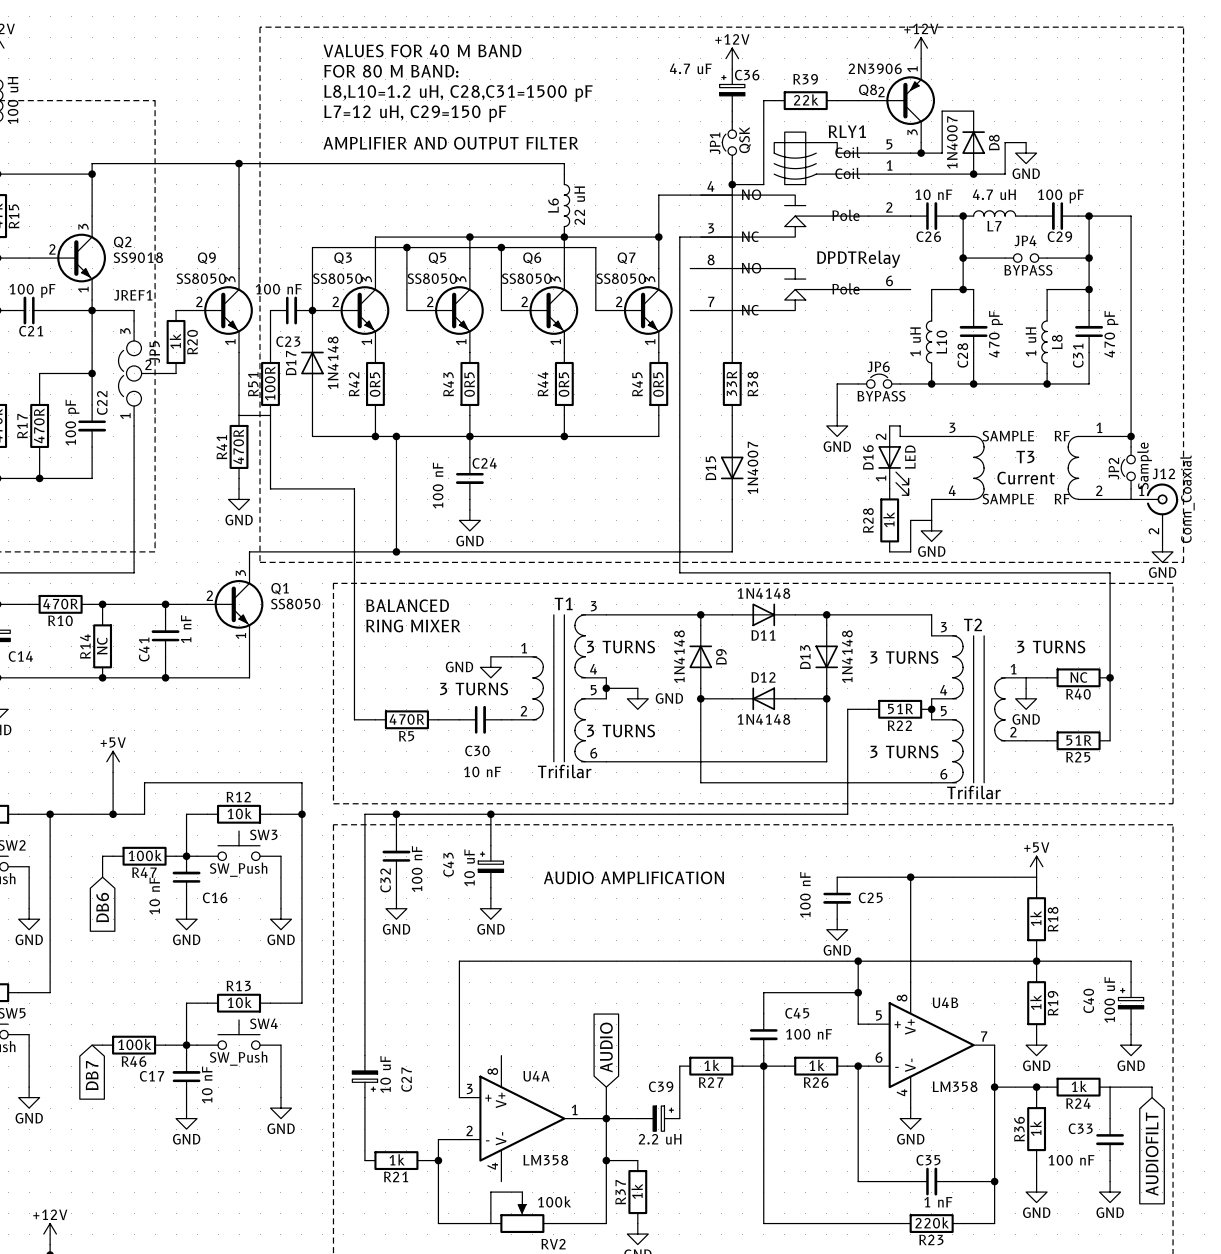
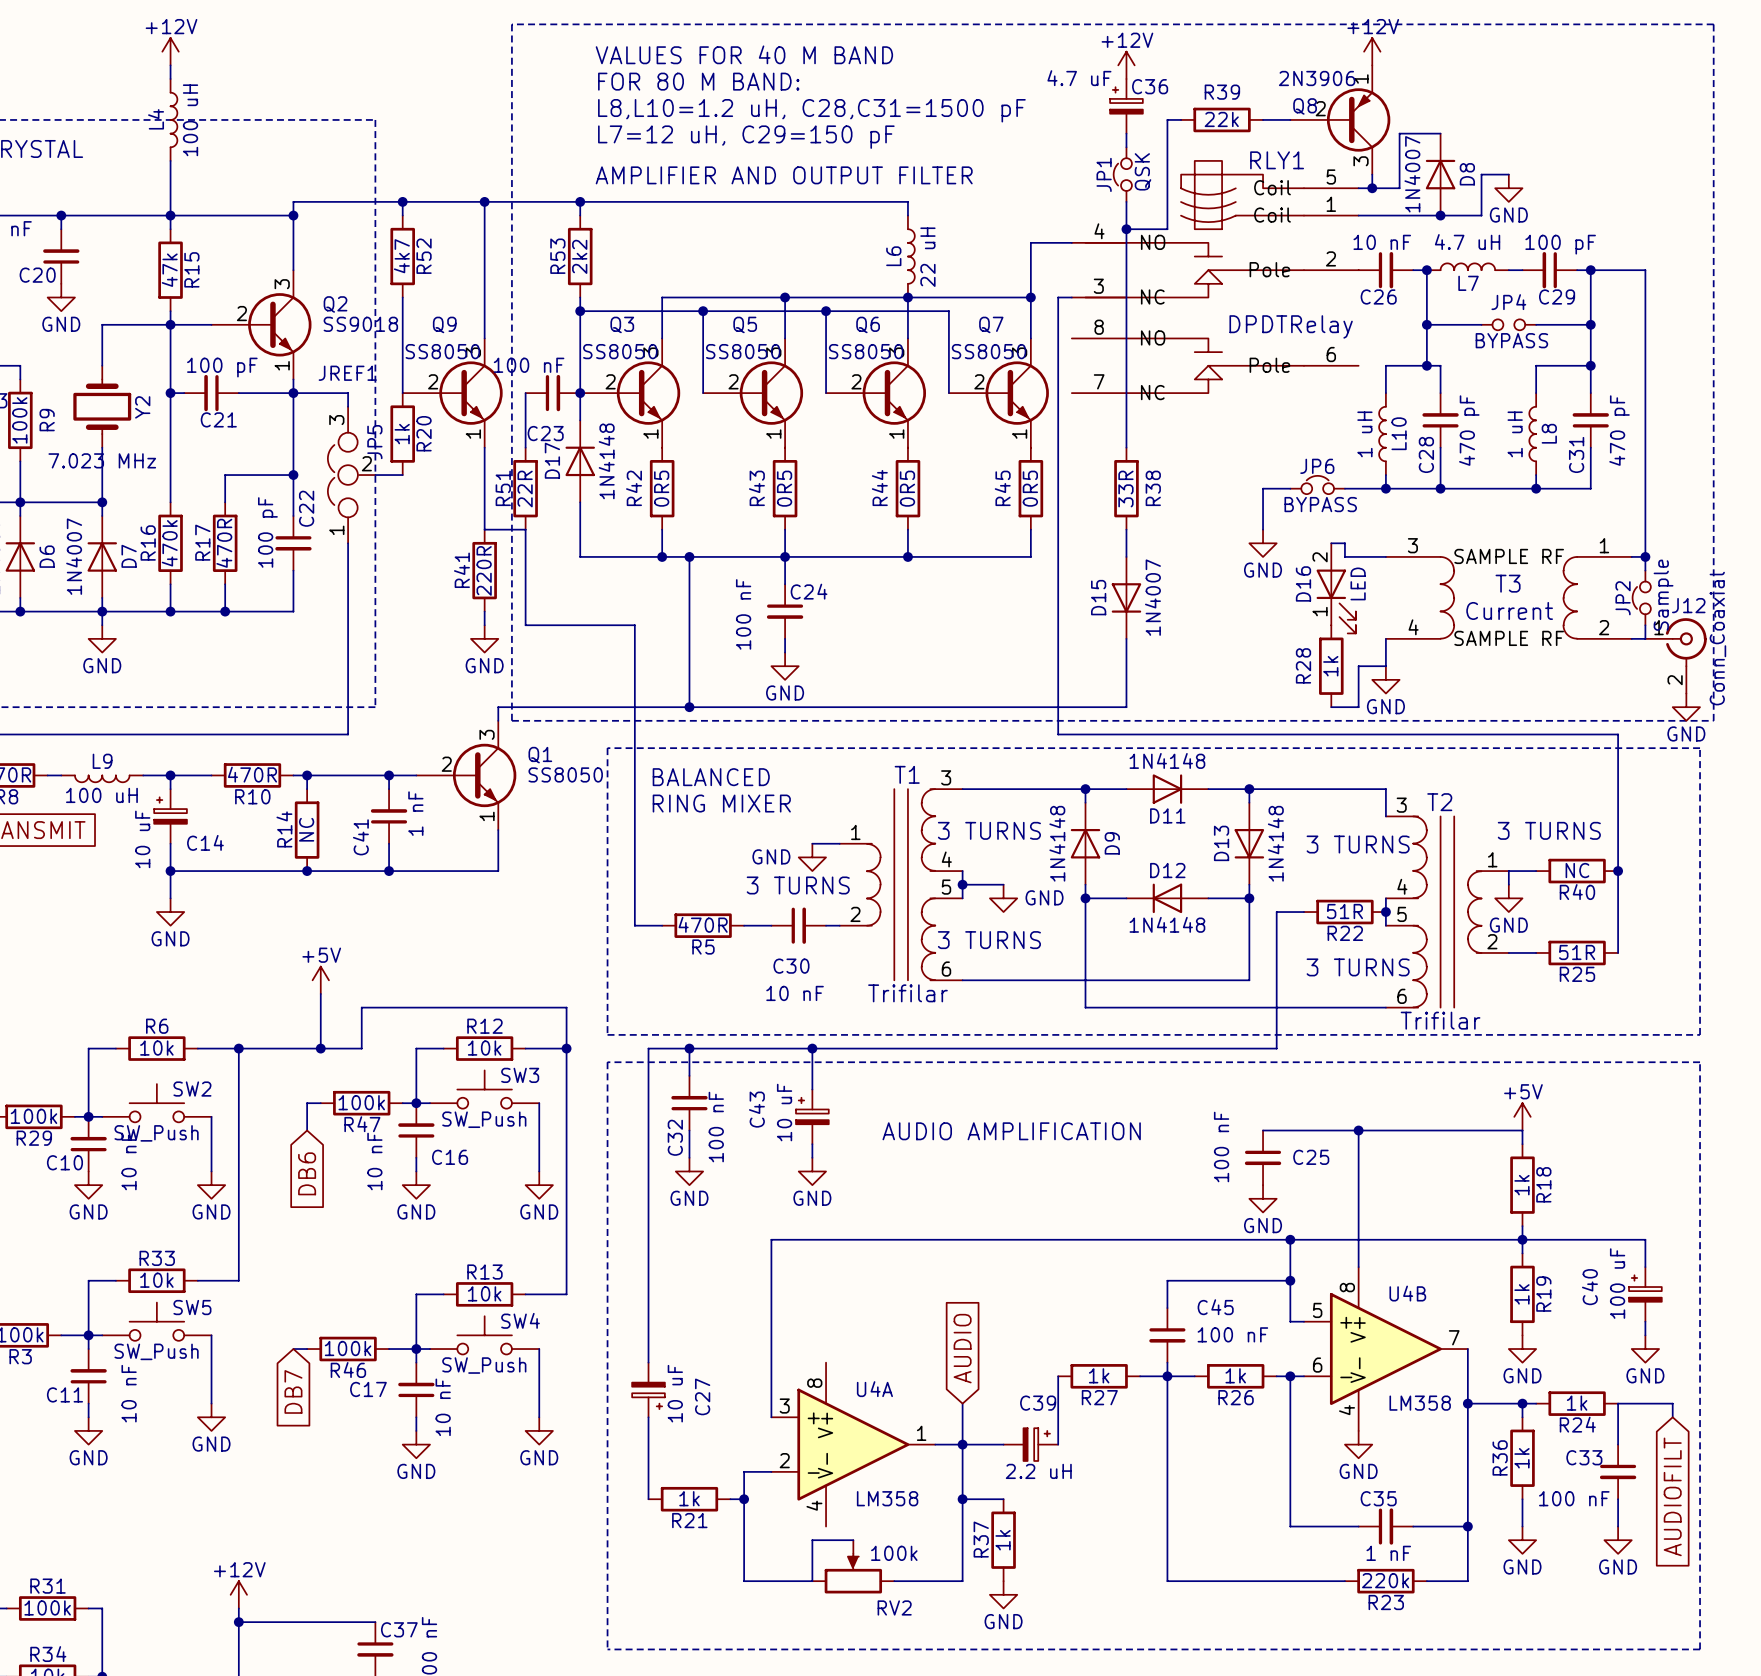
wire: none -> (402, 201) (402, 215)
junction: none -> (402, 201)
wire: none -> (580, 201) (580, 215)
junction: none -> (580, 201)
R52: none -> 4k7 (402, 256)
R53: none -> 2k2 (580, 256)
wire: none -> (402, 297) (402, 393)
wire: none -> (580, 297) (580, 311)
junction: none -> (580, 311)
R51 value: 100R (270, 383) -> 22R (525, 489)
R41 value: 470R (238, 446) -> 220R (484, 570)

